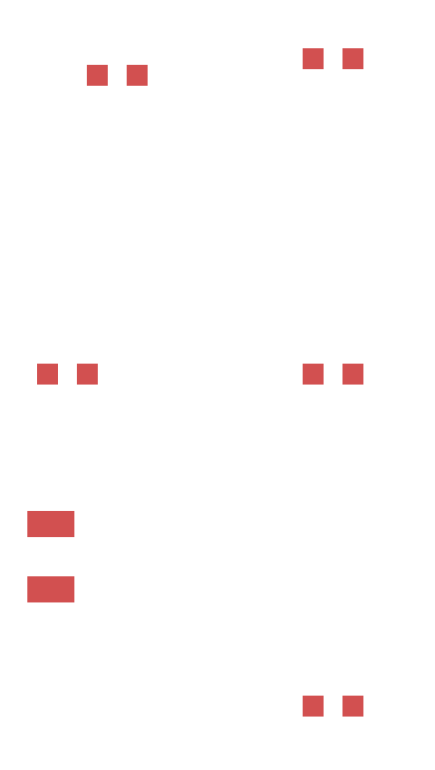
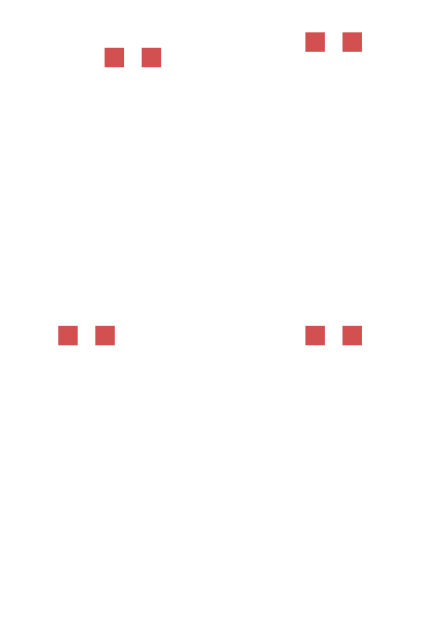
part: (50, 556) -> none

